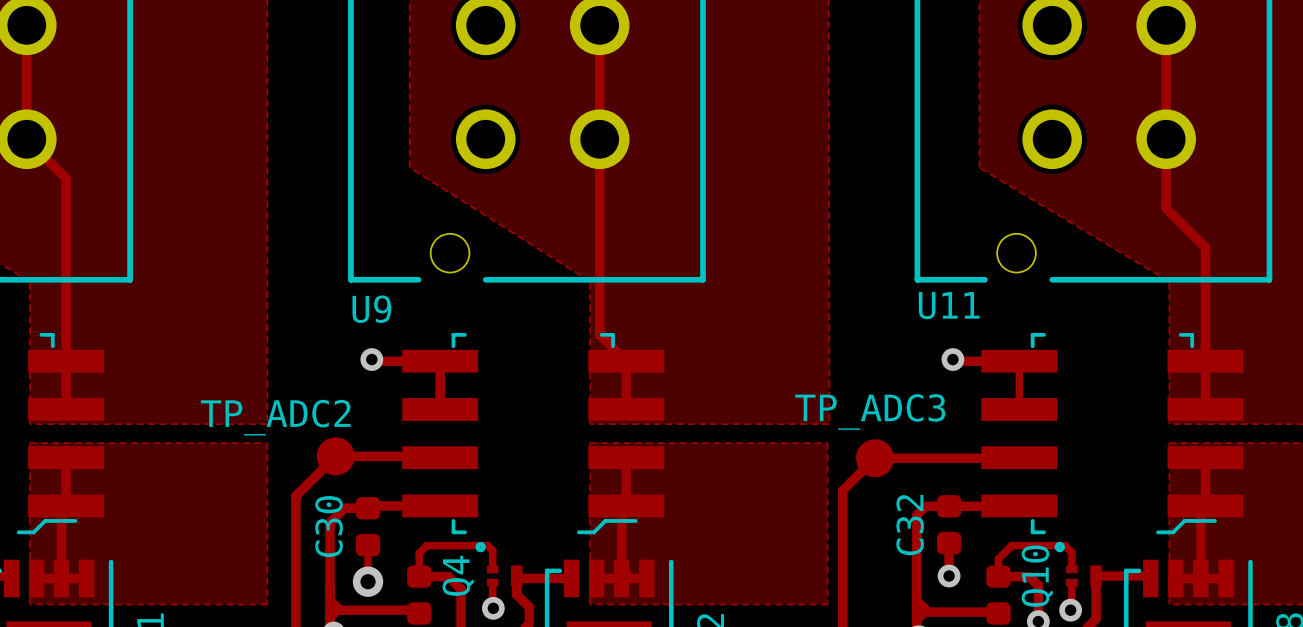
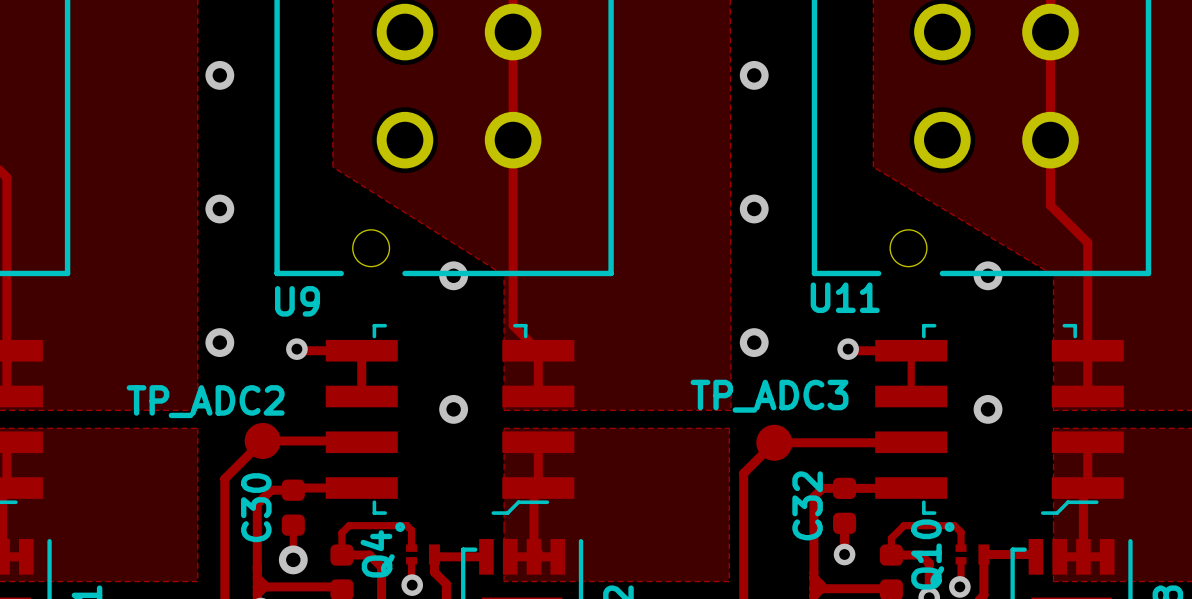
via: none -> (219, 75)
via: none -> (754, 75)
via: none -> (219, 208)
via: none -> (754, 208)
via: none -> (453, 275)
via: none -> (988, 275)
via: none -> (219, 342)
via: none -> (754, 342)
via: none -> (453, 409)
via: none -> (988, 409)

